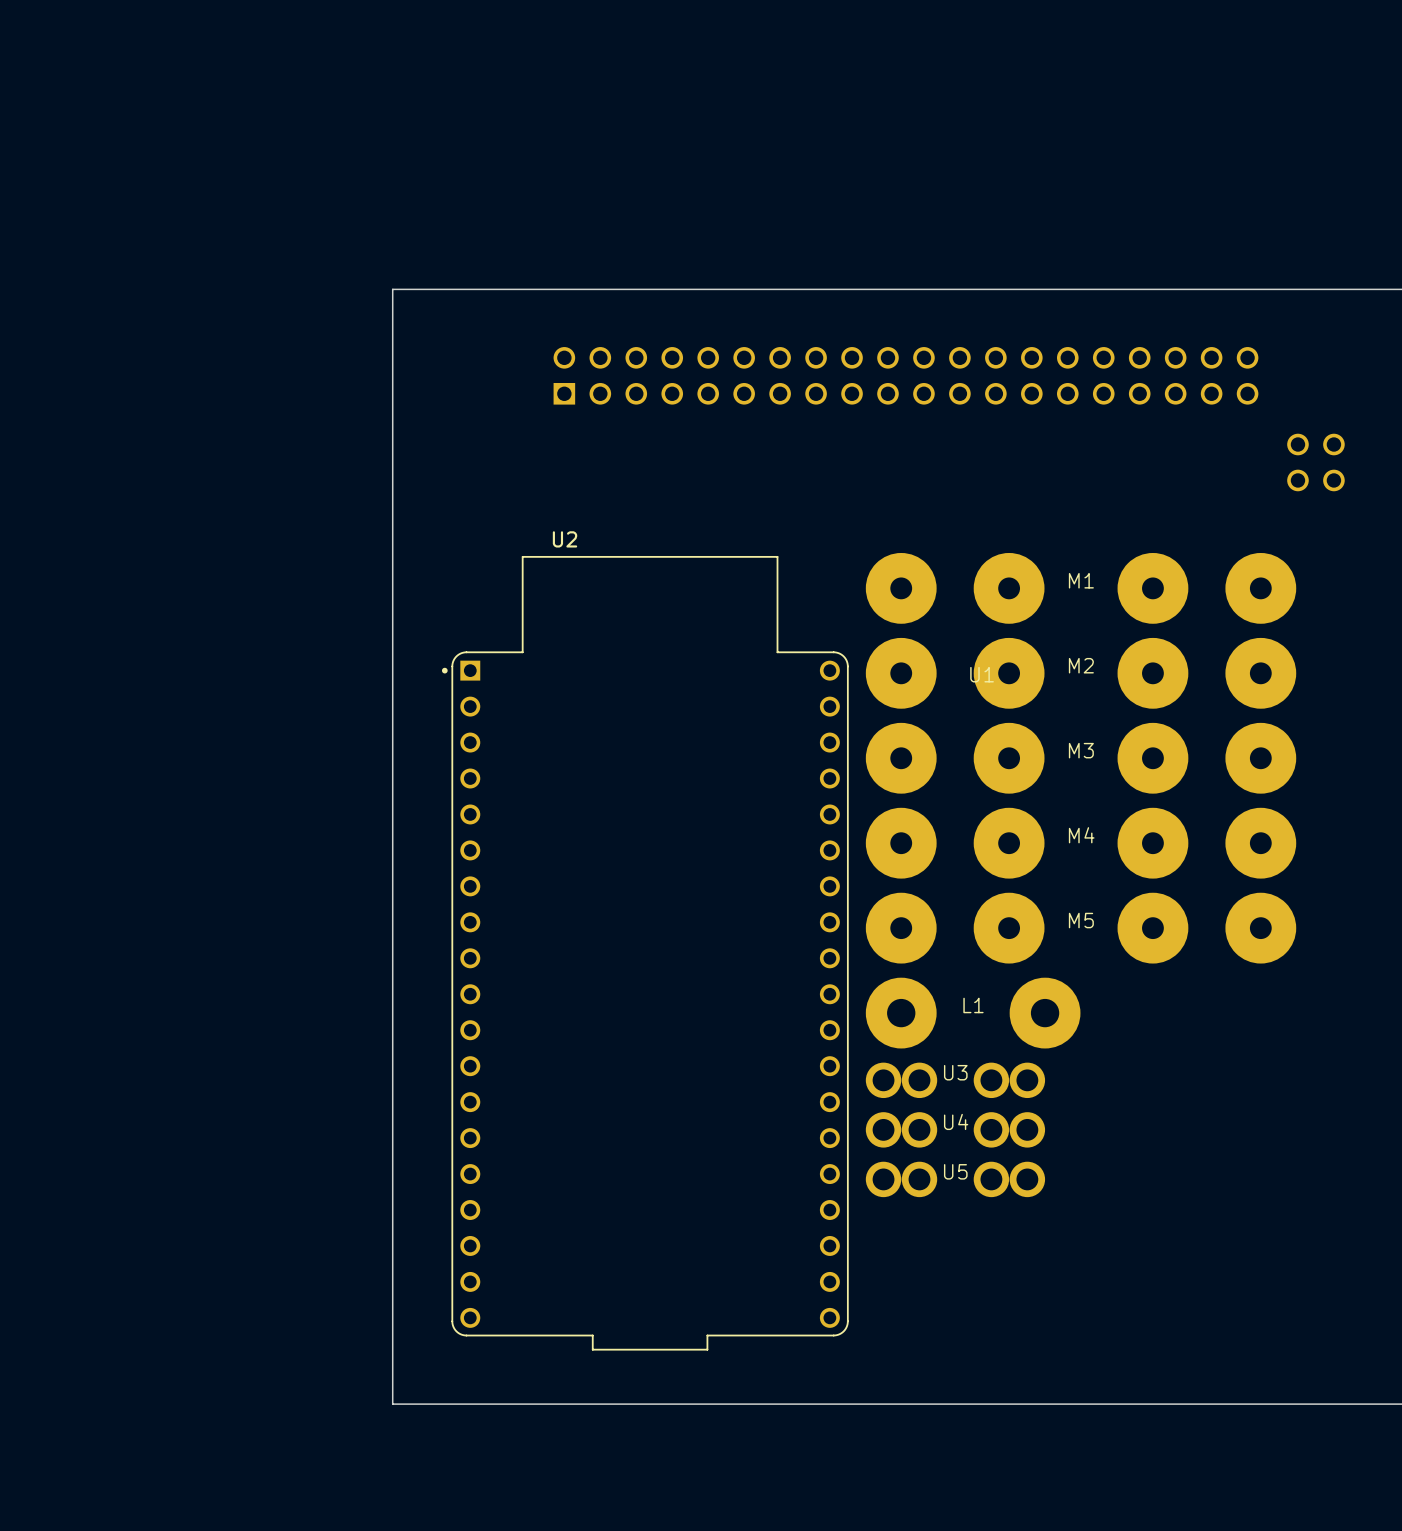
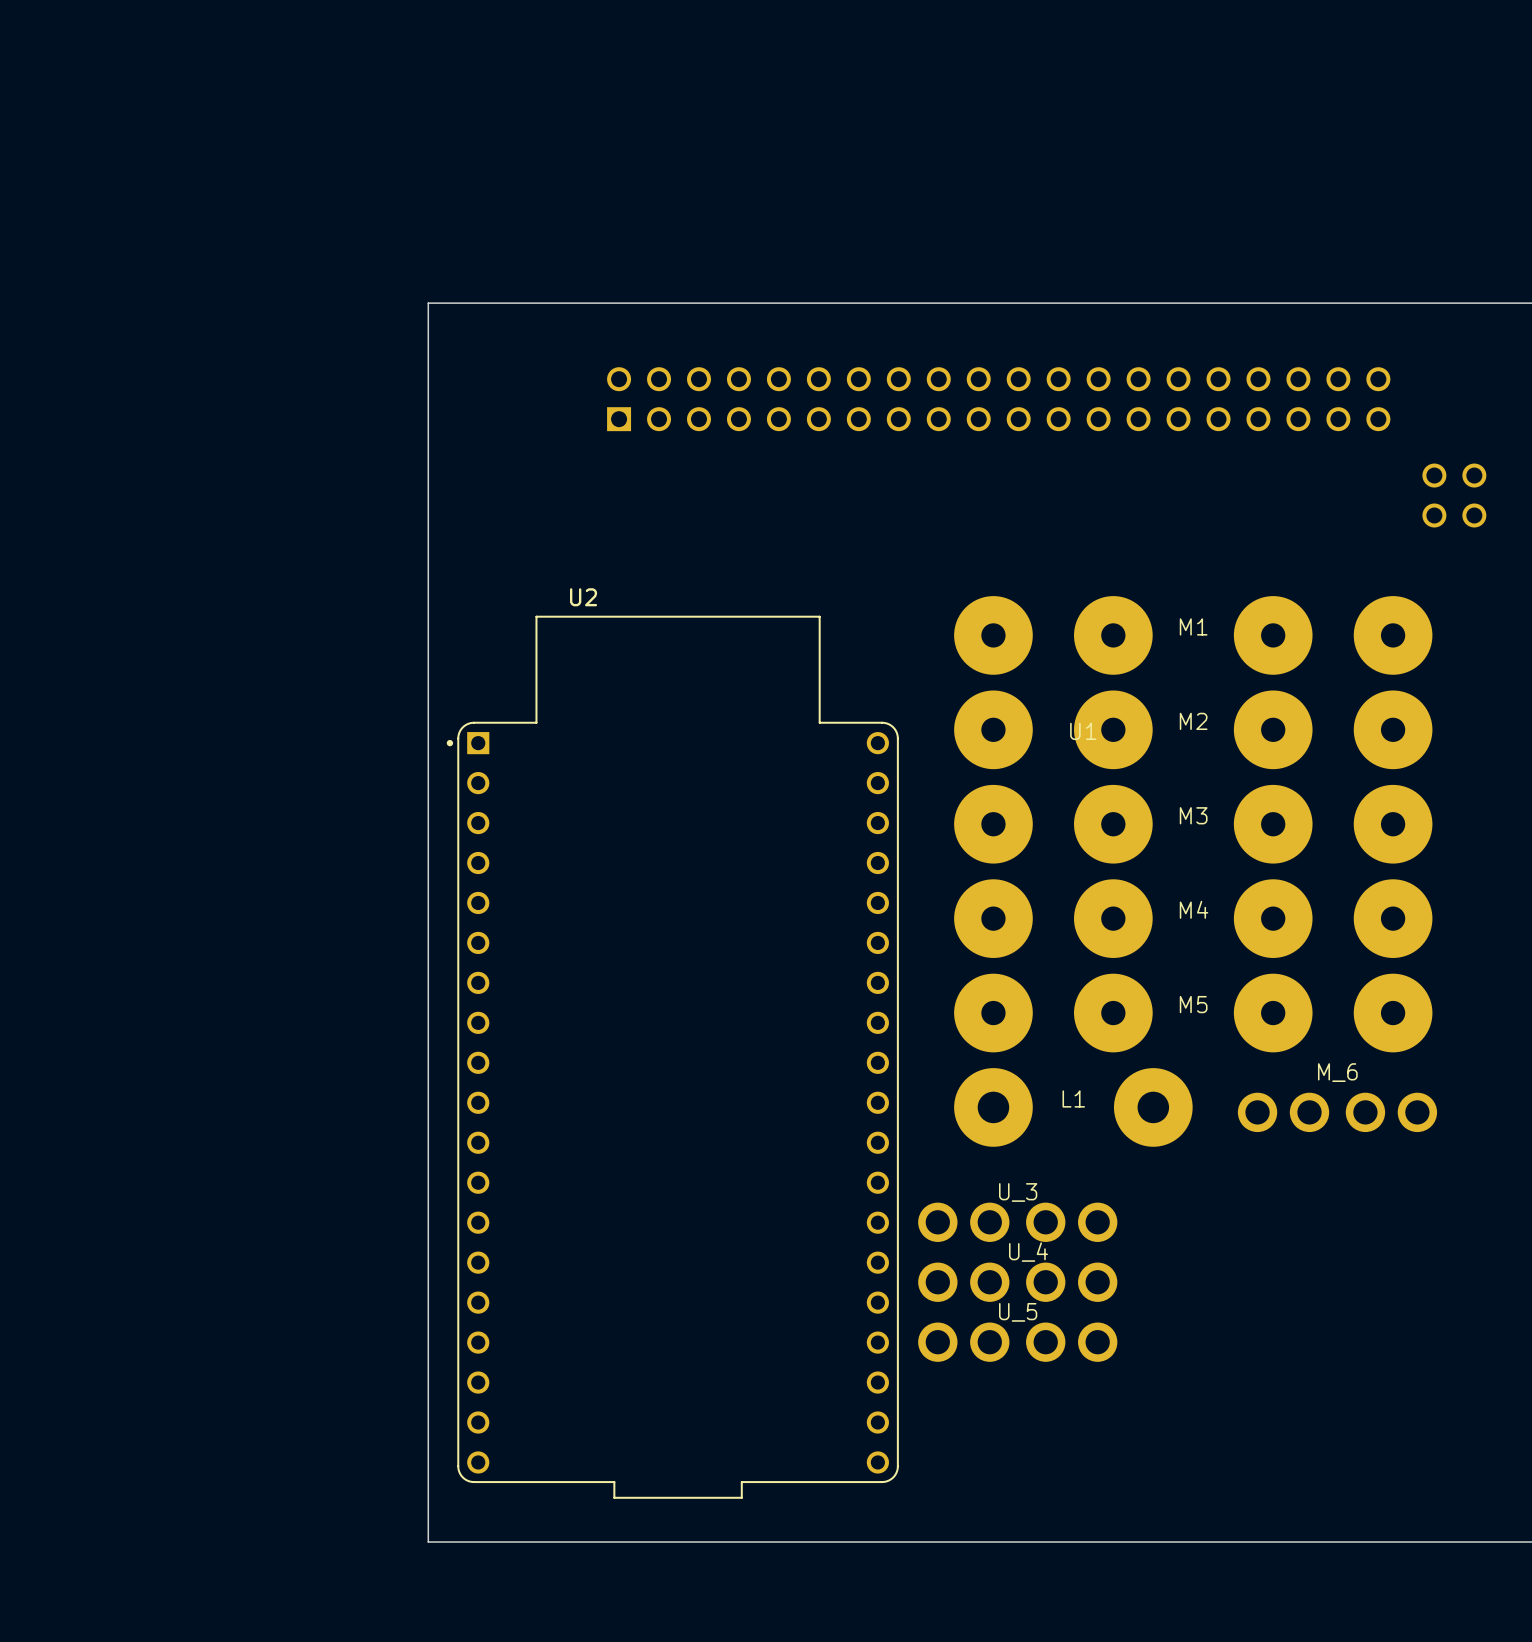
U2 position: (645, 953) -> (672, 1057)
M_6: none -> (1337, 1112)
U3: (955, 1080) -> none
U_3: none -> (1017, 1222)
U4: (955, 1129) -> none
U_4: none -> (1017, 1282)
U5: (955, 1179) -> none
U_5: none -> (1017, 1342)

